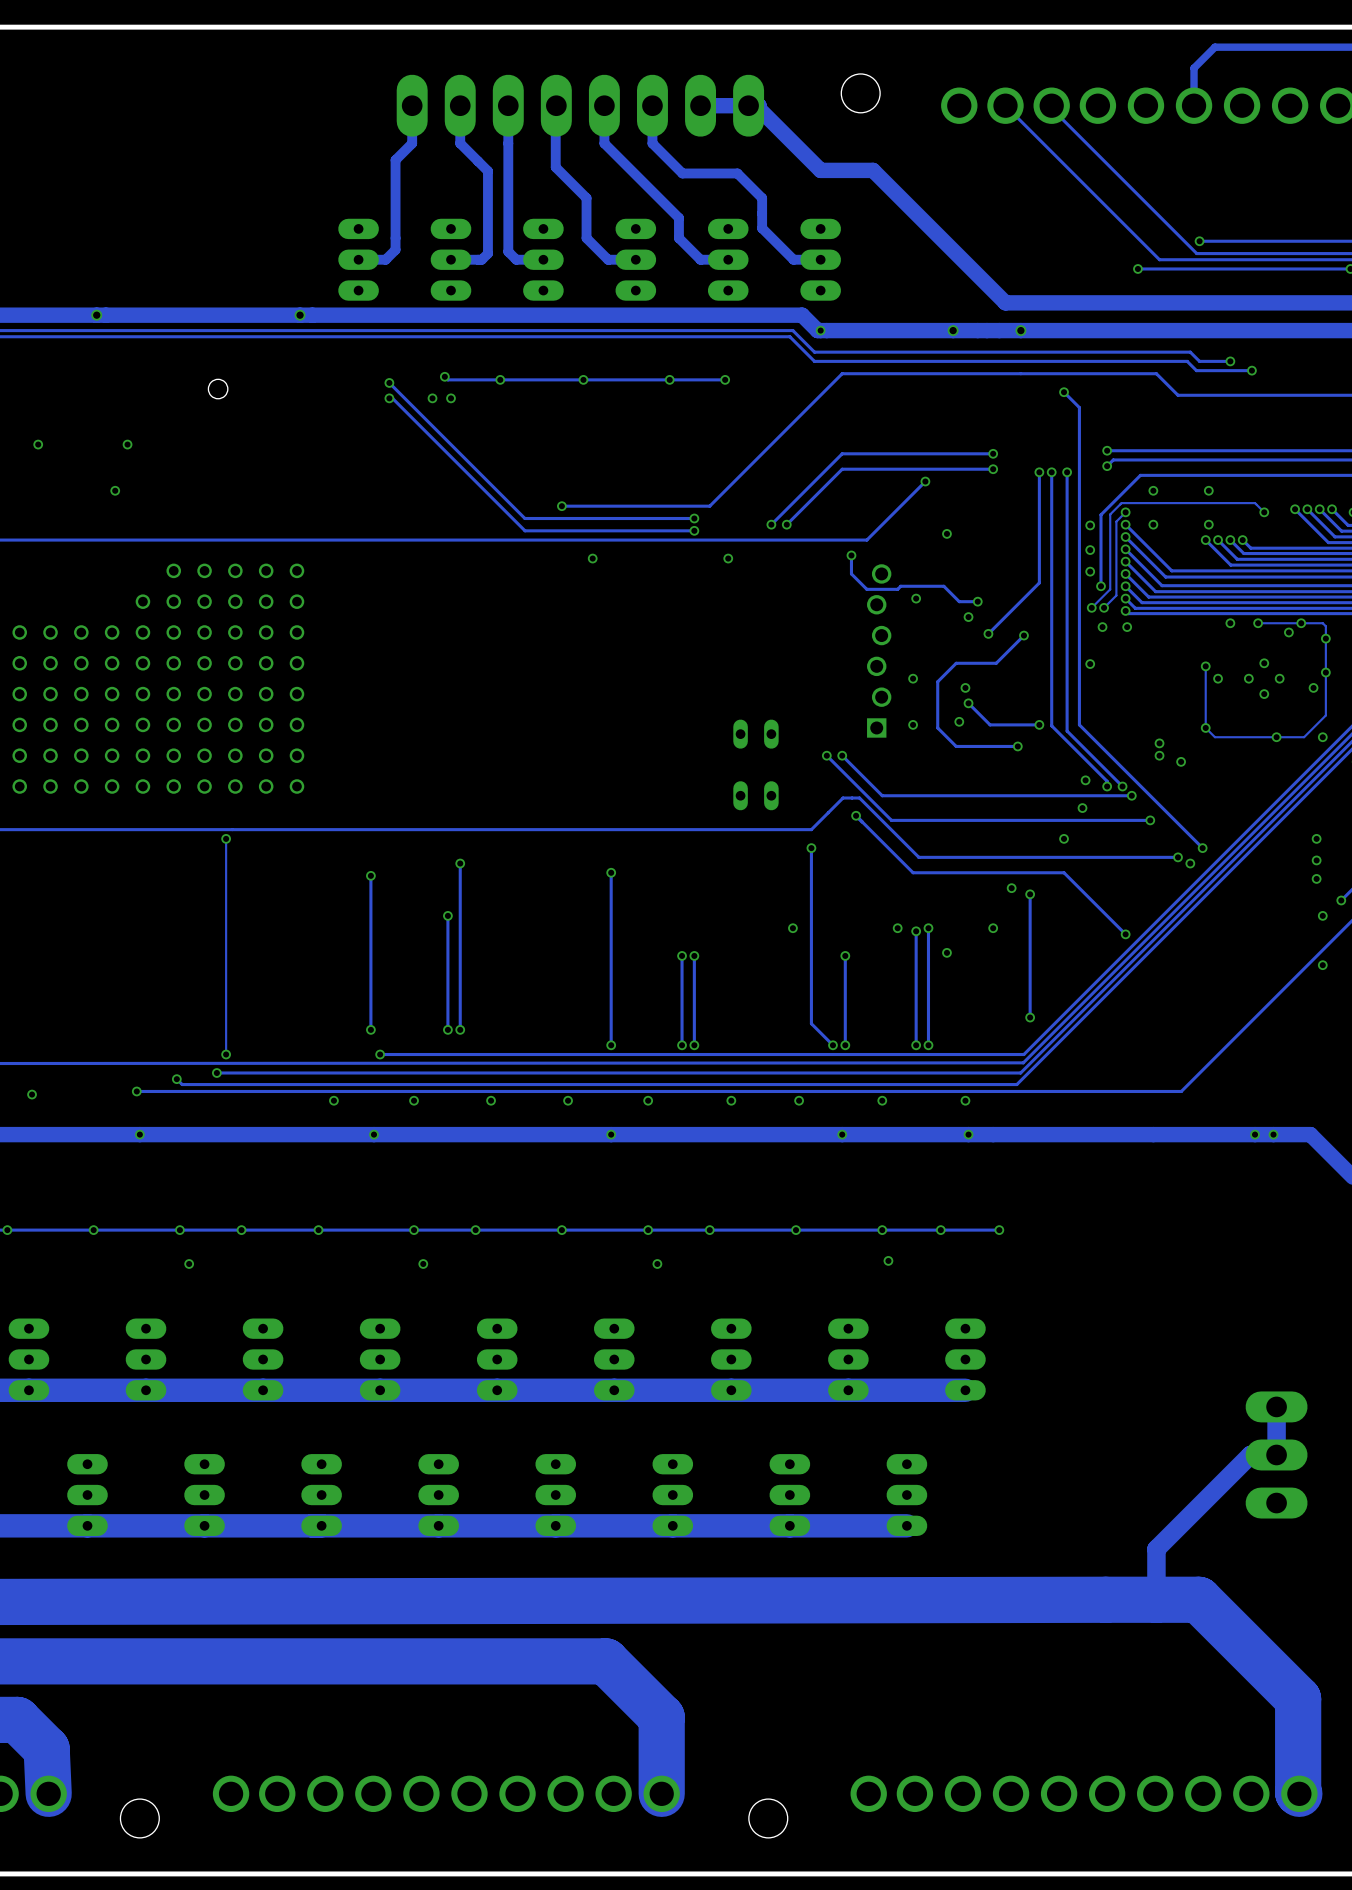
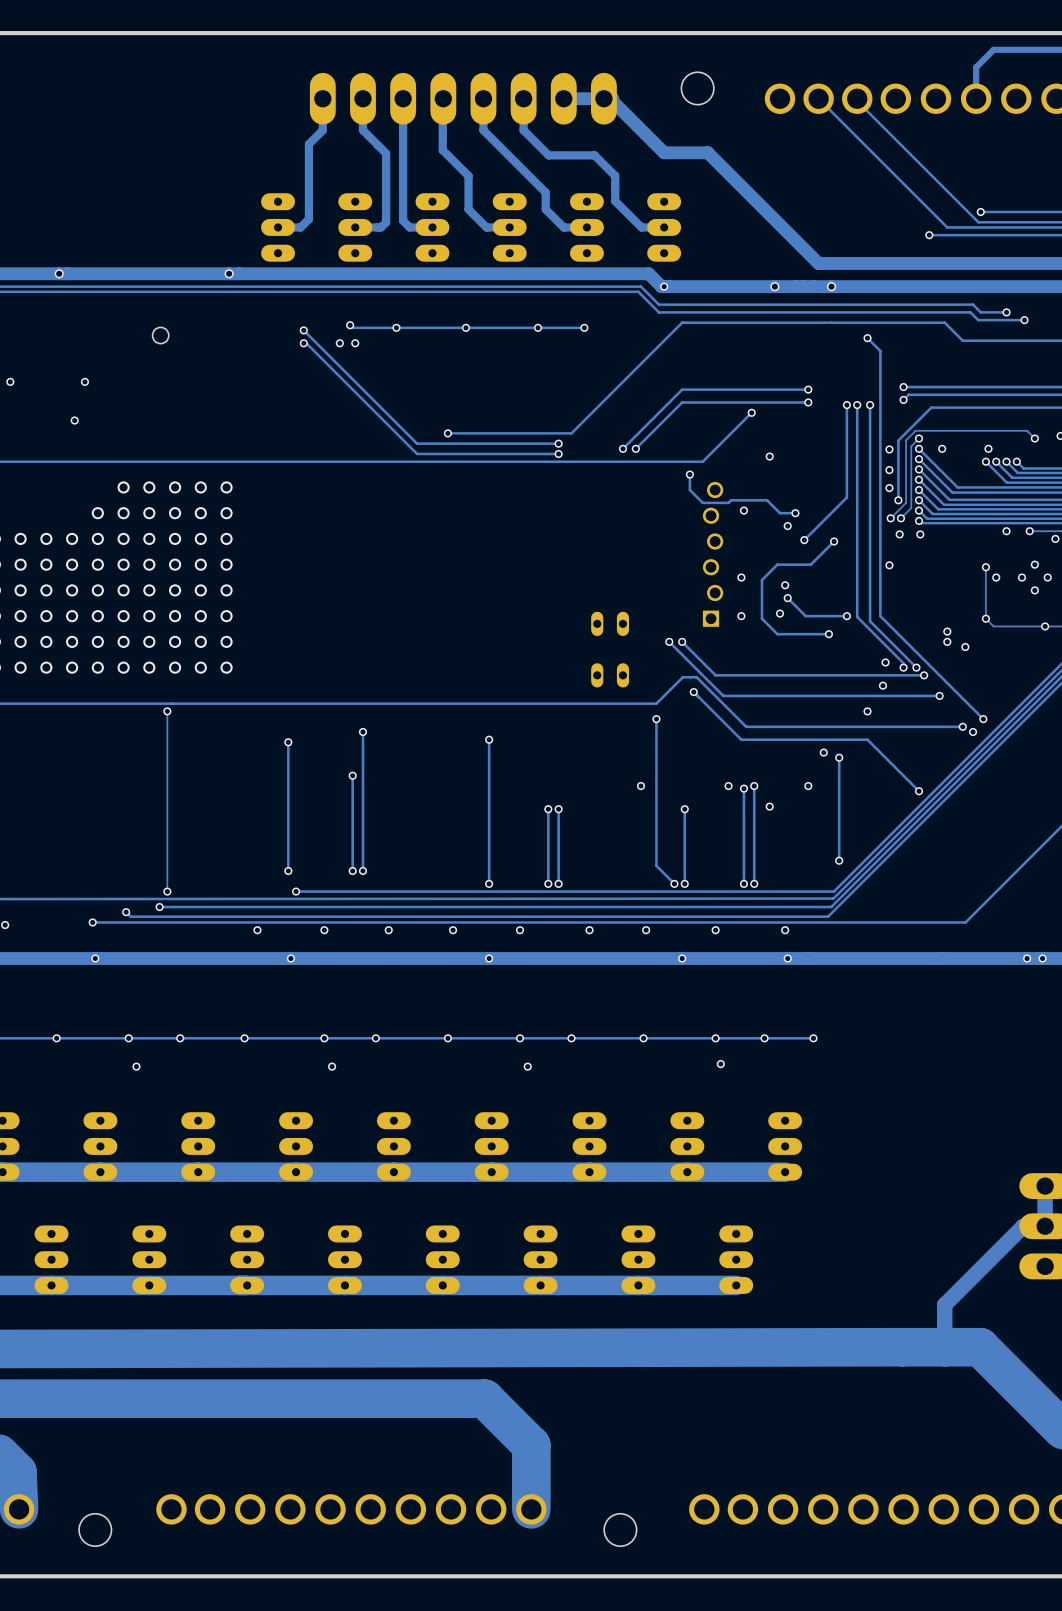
via: (1153, 490) -> none
via: (1208, 490) -> none
via: (592, 558) -> none
via: (728, 558) -> none

